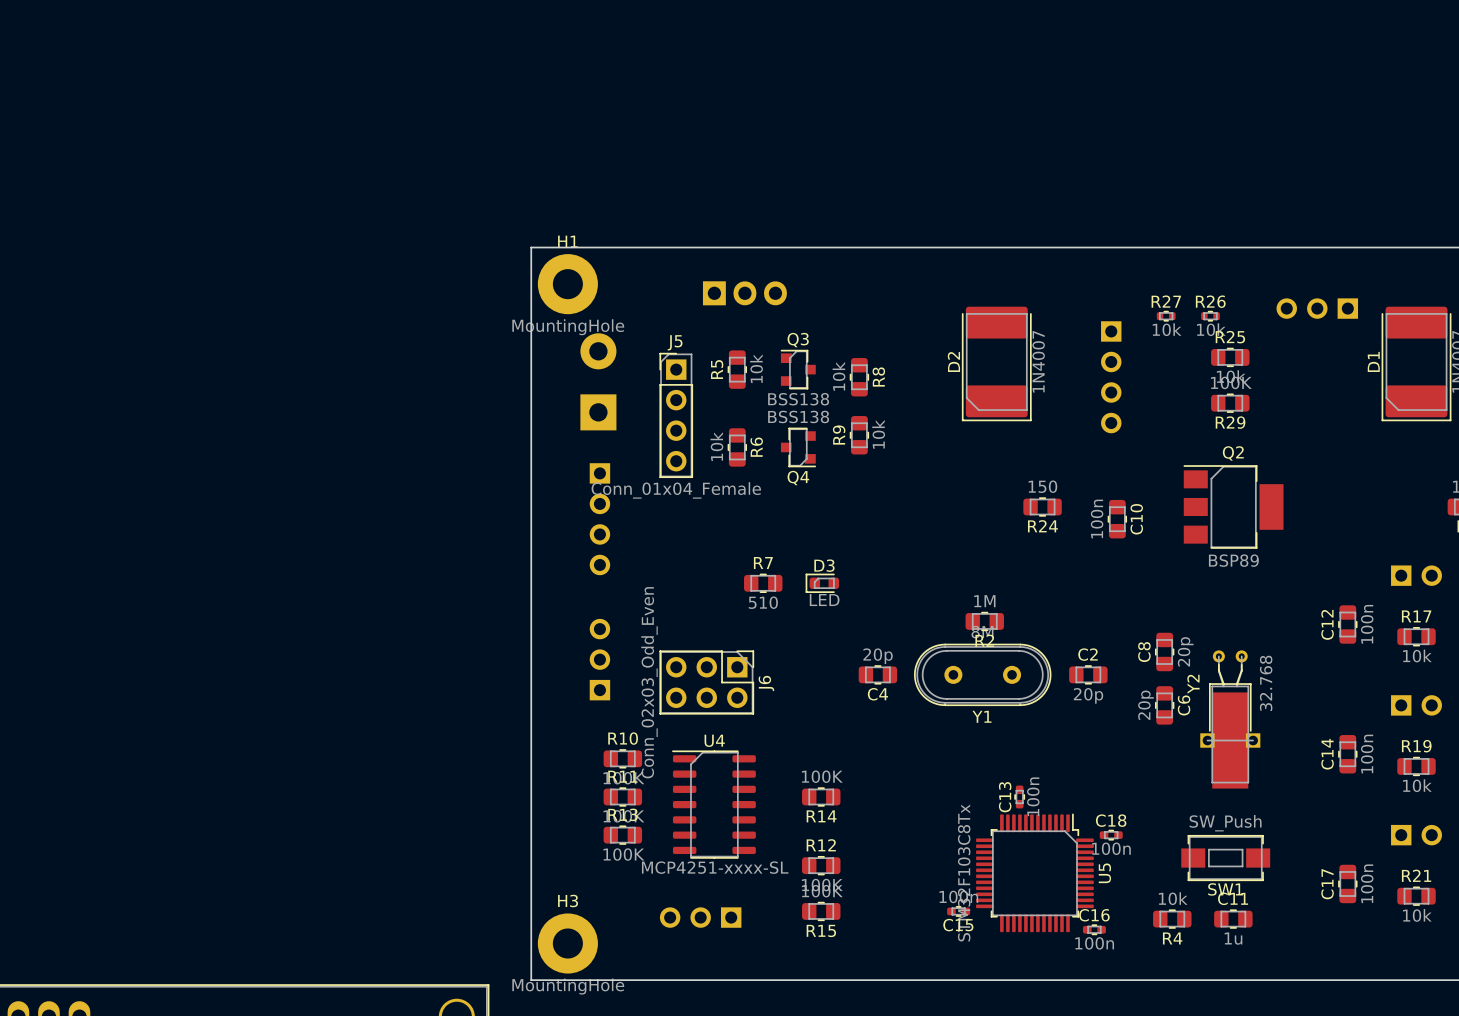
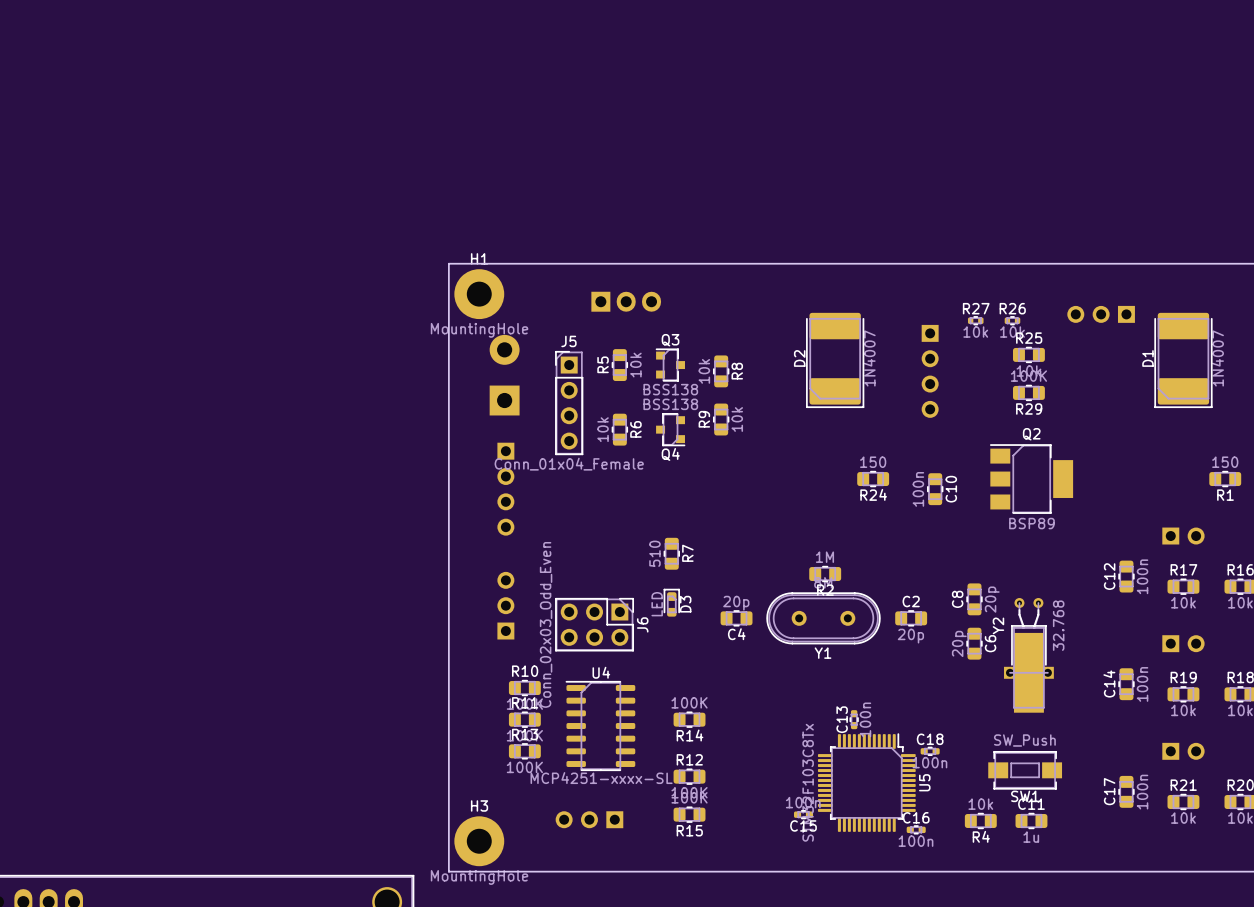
R7 rotation: 0° (763, 583) -> 90° clockwise (671, 553)
R7 position: (763, 583) -> (671, 553)
D3 rotation: 0° (822, 583) -> 90° clockwise (671, 602)
D3 position: (822, 583) -> (671, 602)

